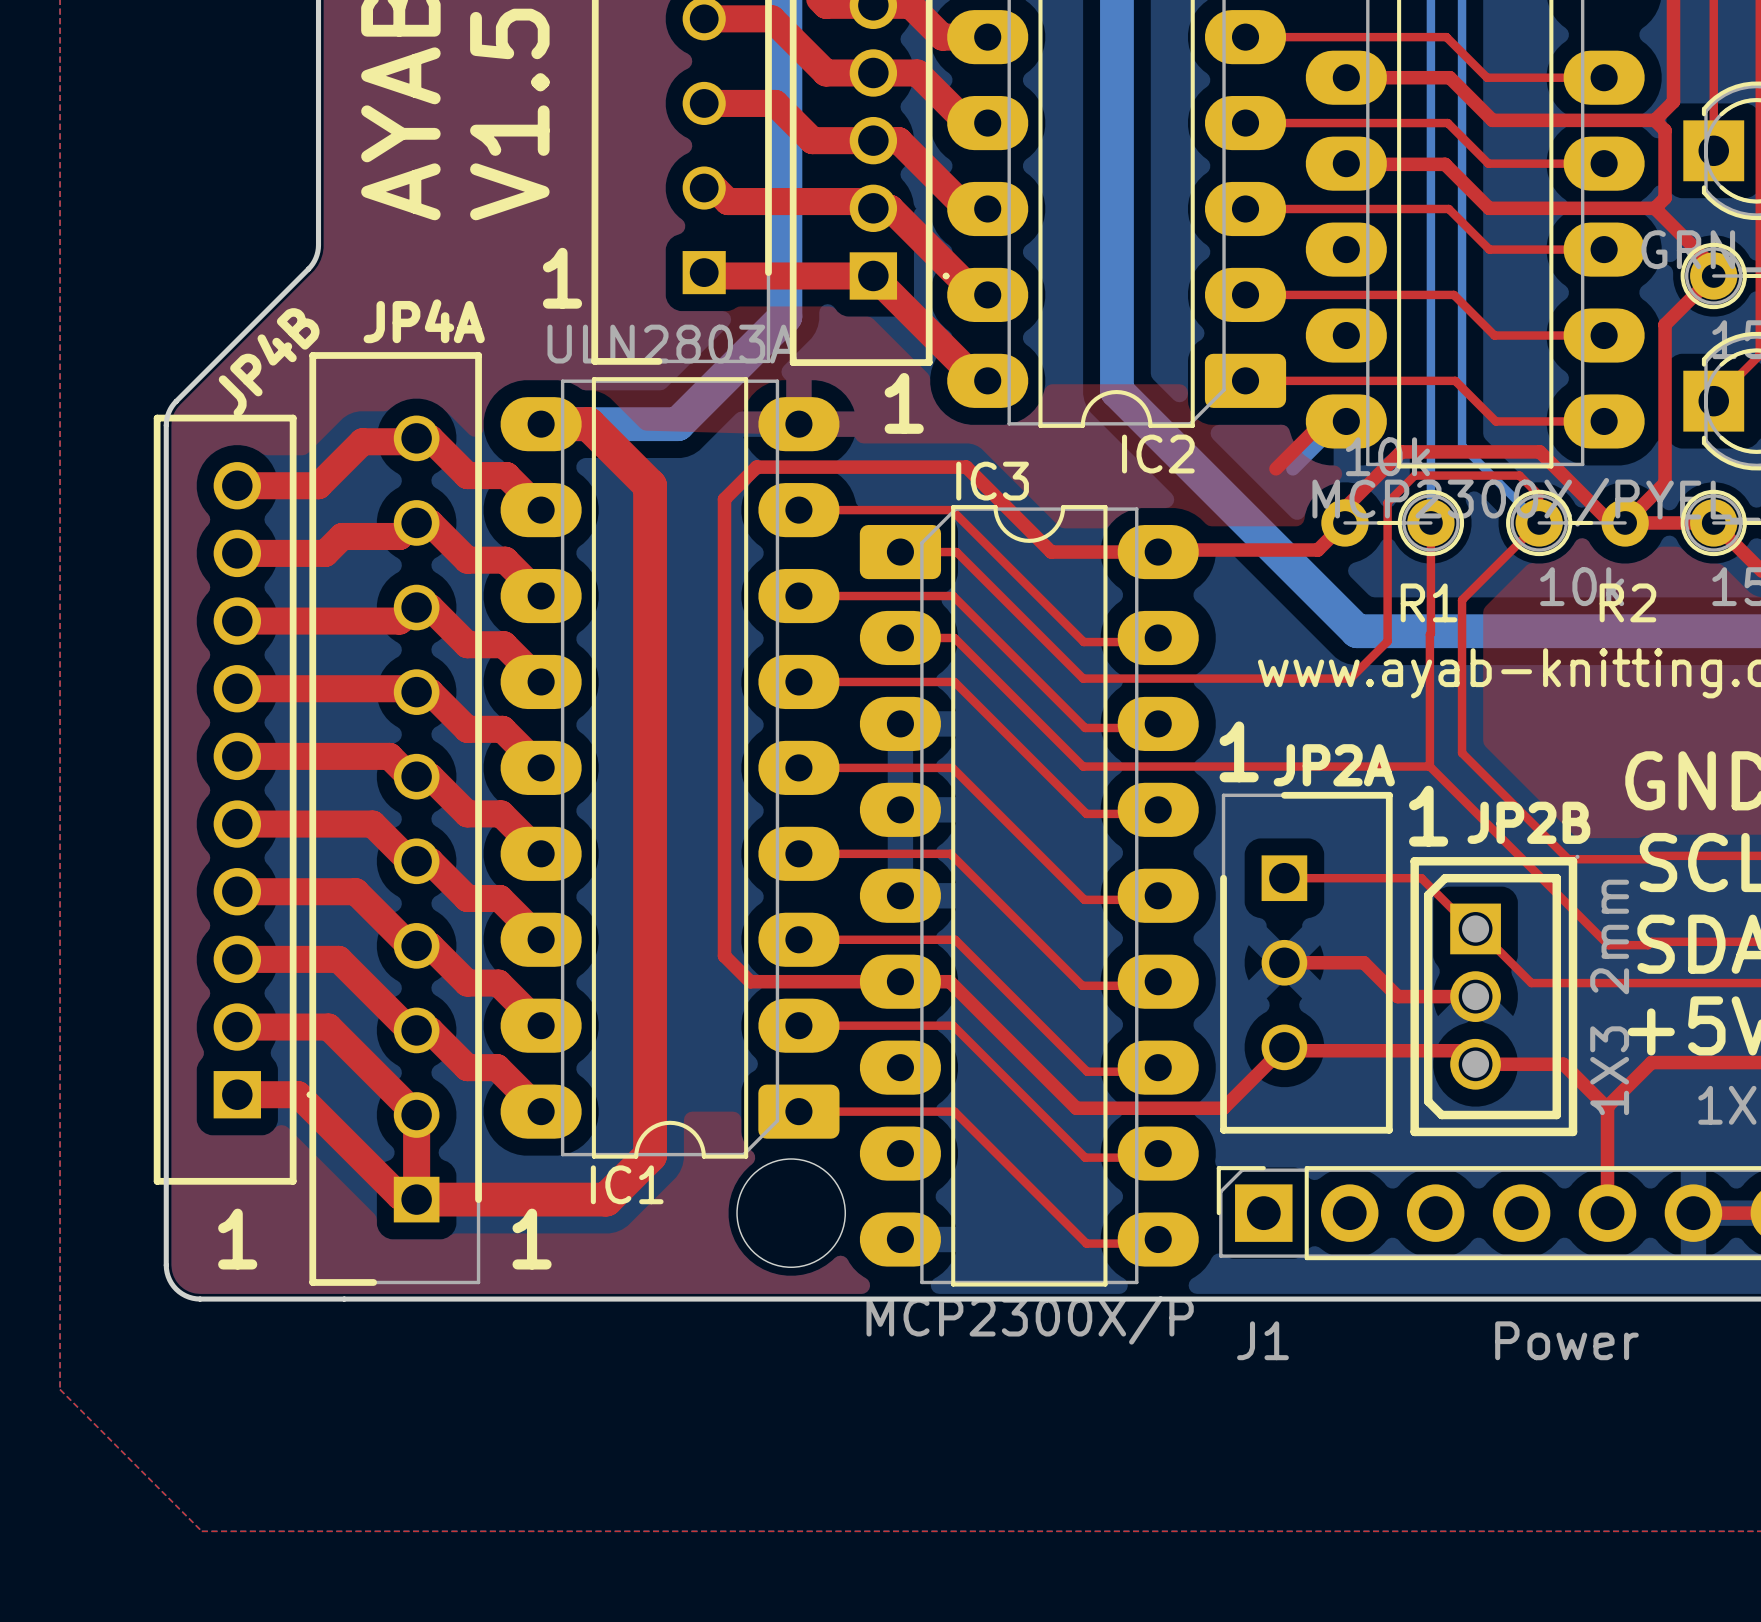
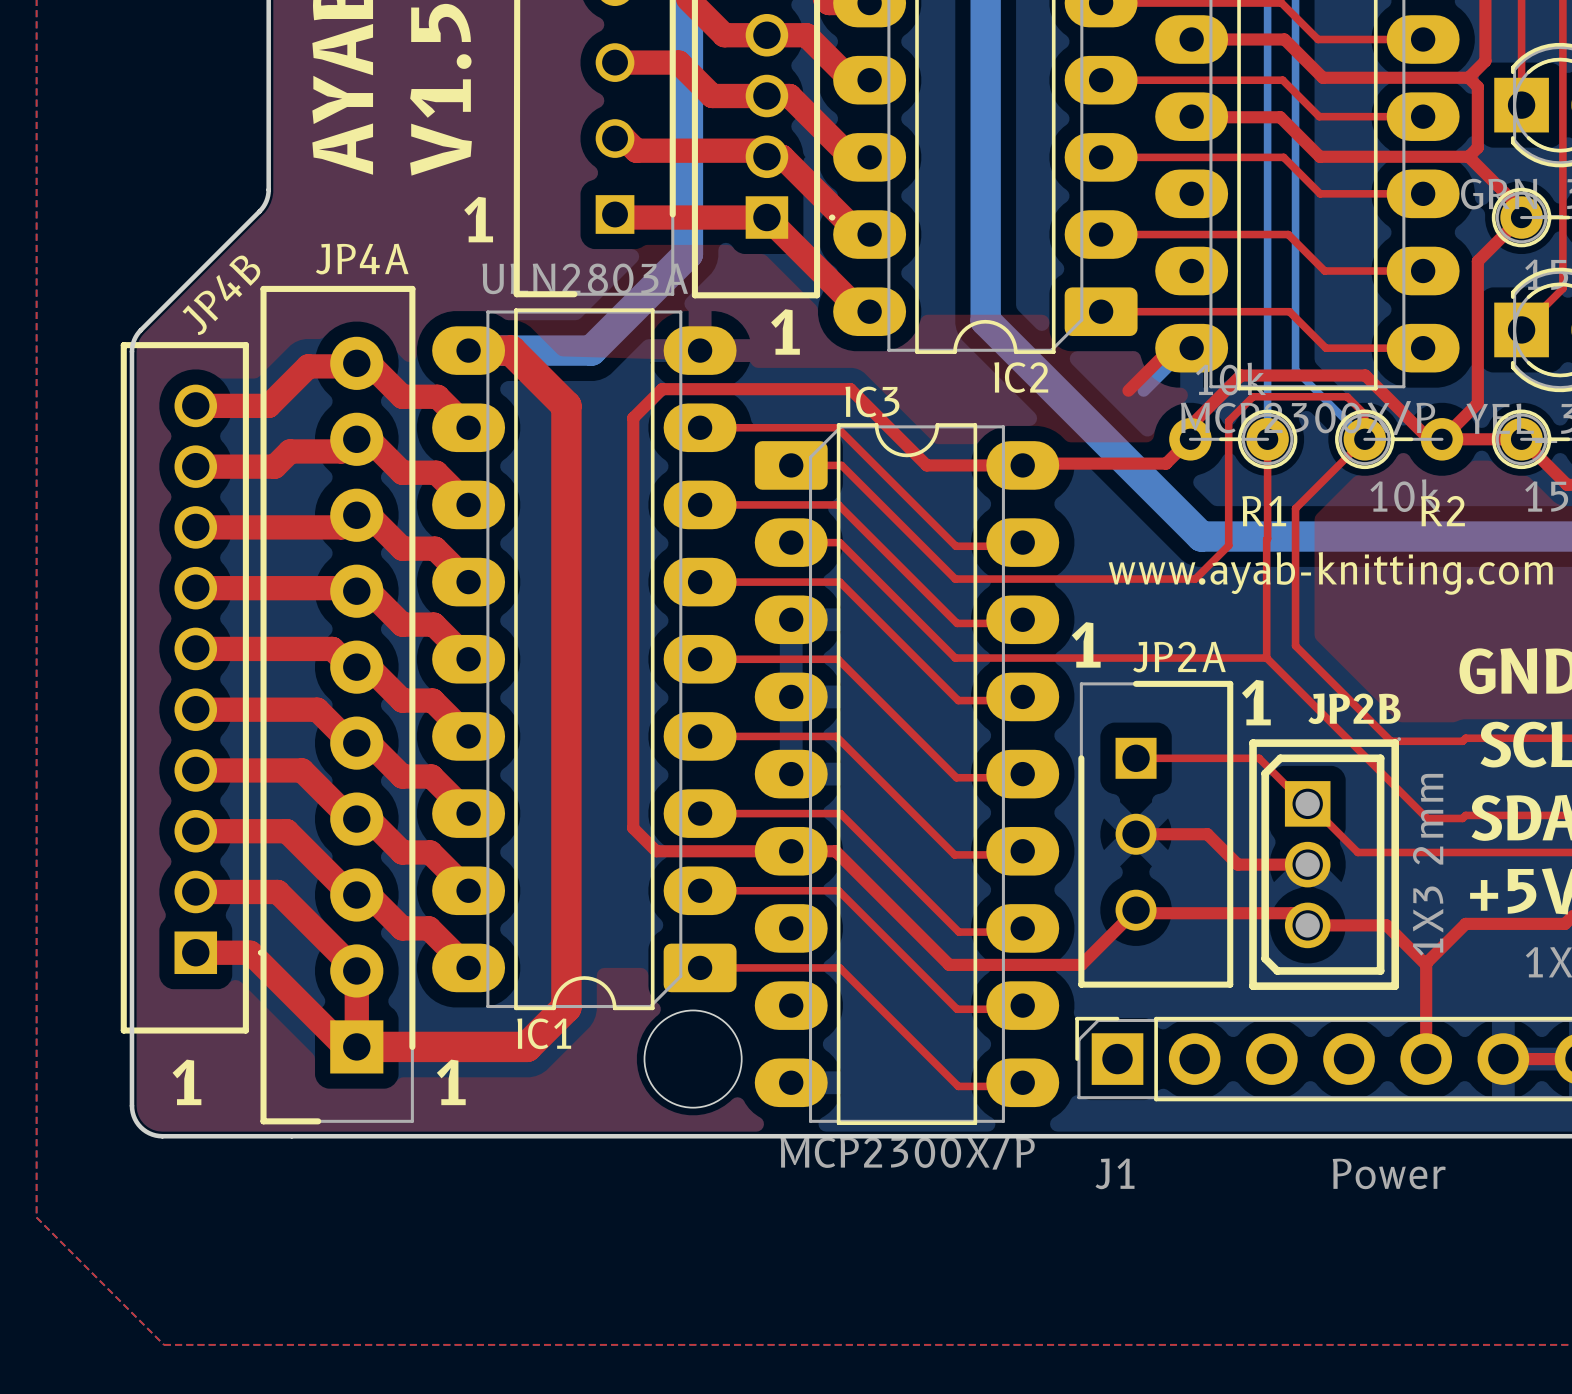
JP4A footprint: [309, 352, 482, 1286] -> [260, 285, 416, 1125]

